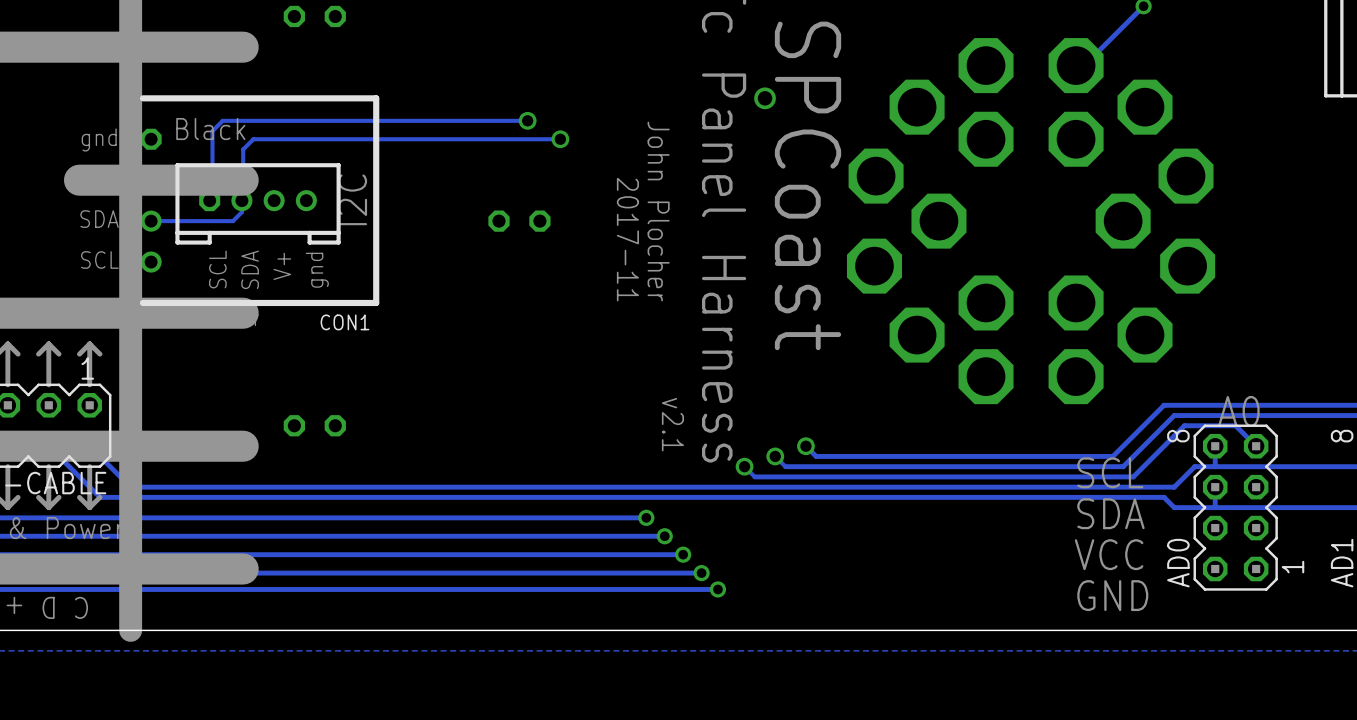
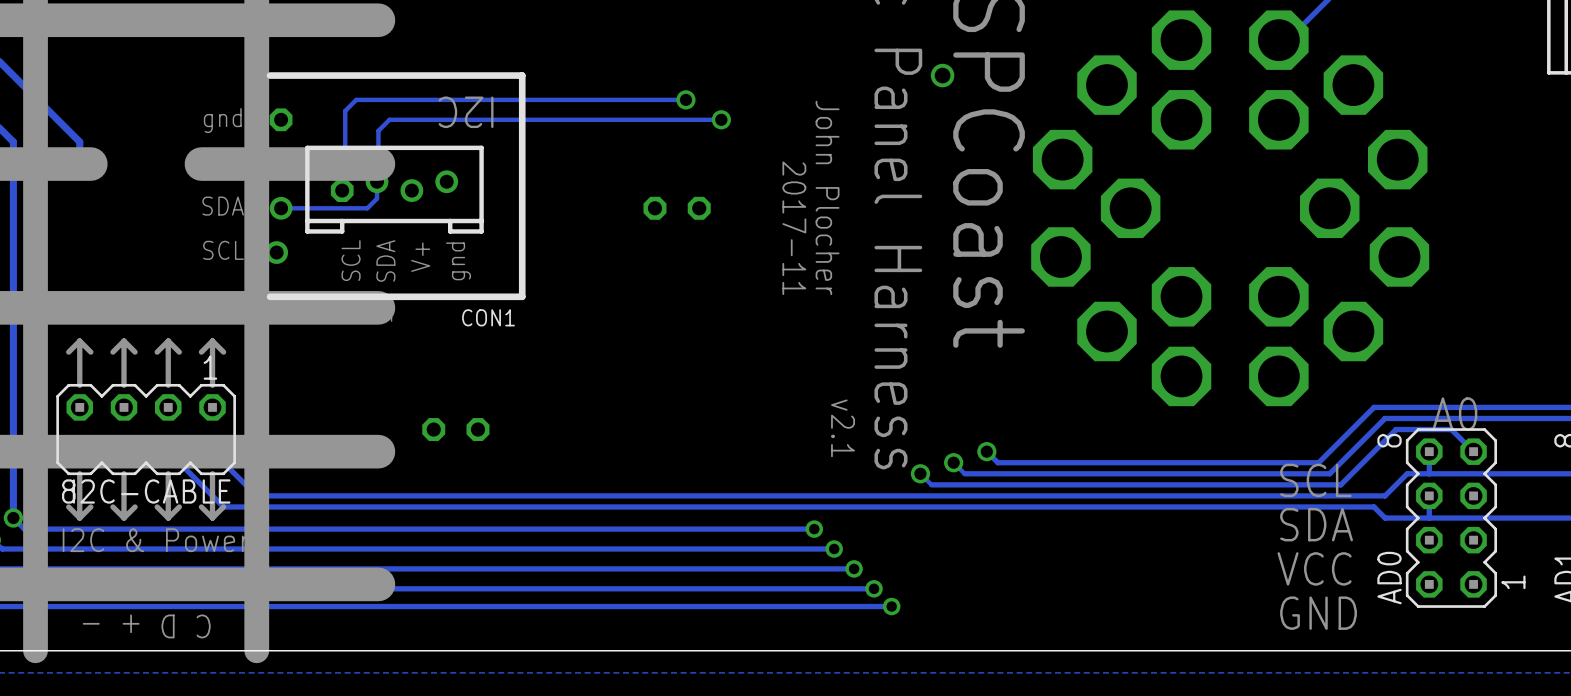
CON1 footprint: [139, 95, 380, 307] -> [265, 72, 526, 301]

